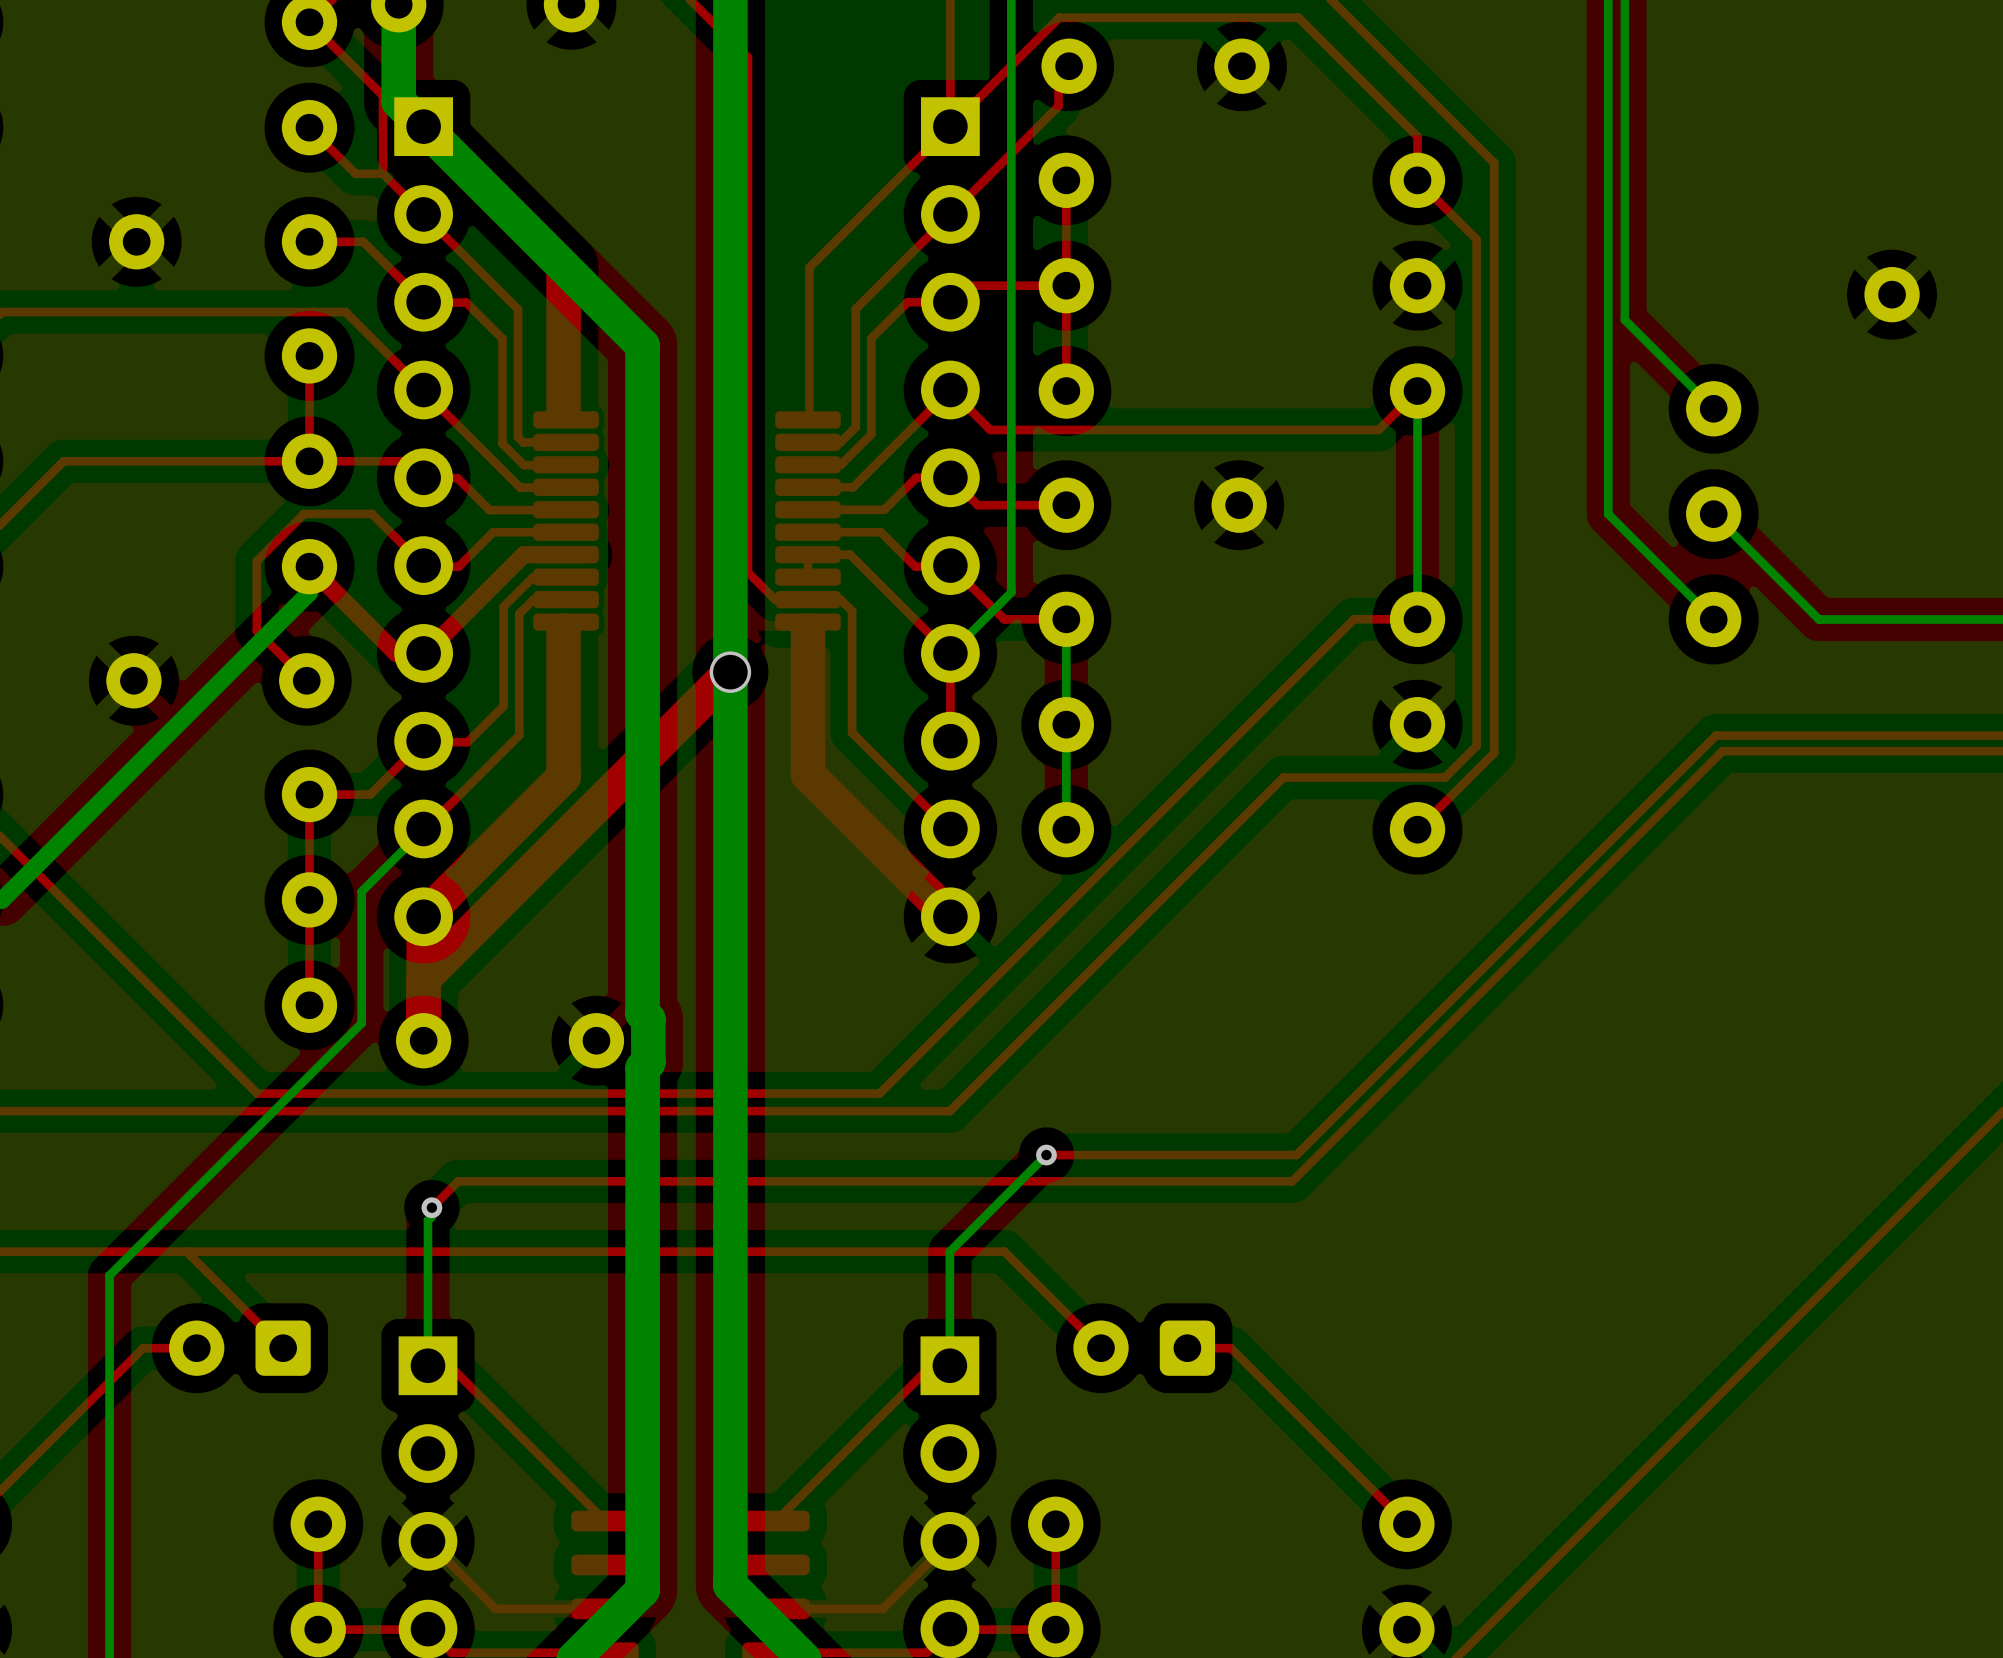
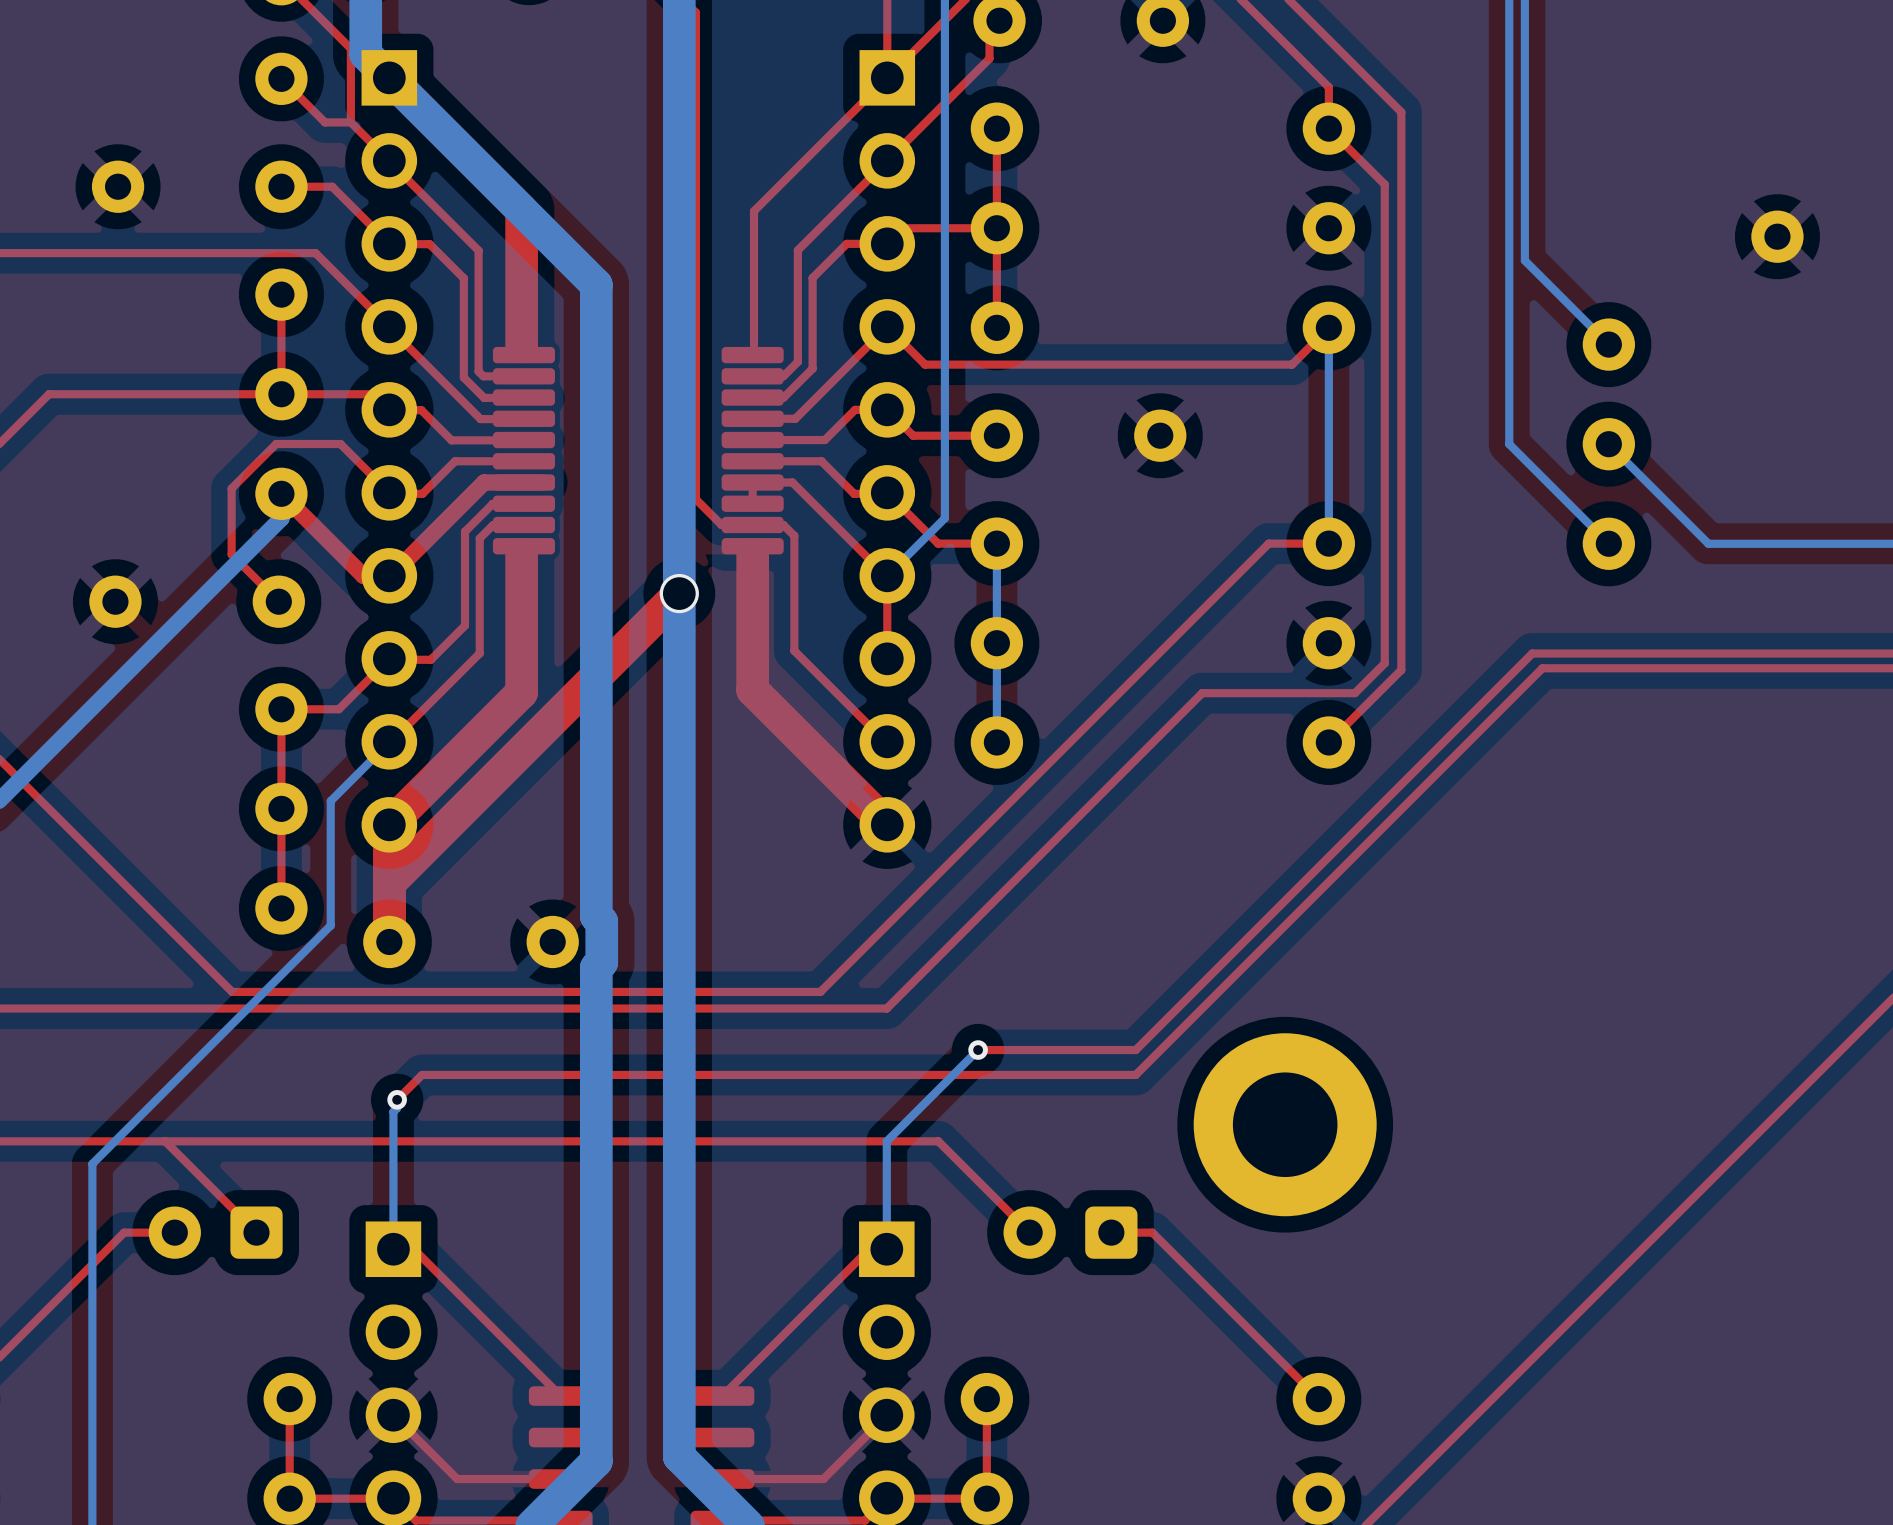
top track: (1716, 735) (1296, 1155) (1213, 1155) -> (1611, 653) (1532, 653) (1135, 1050)
top track: (1722, 751) (1292, 1181) (1213, 1181) -> (1617, 668) (1542, 668) (1135, 1074)
part: none -> (1285, 1124)

